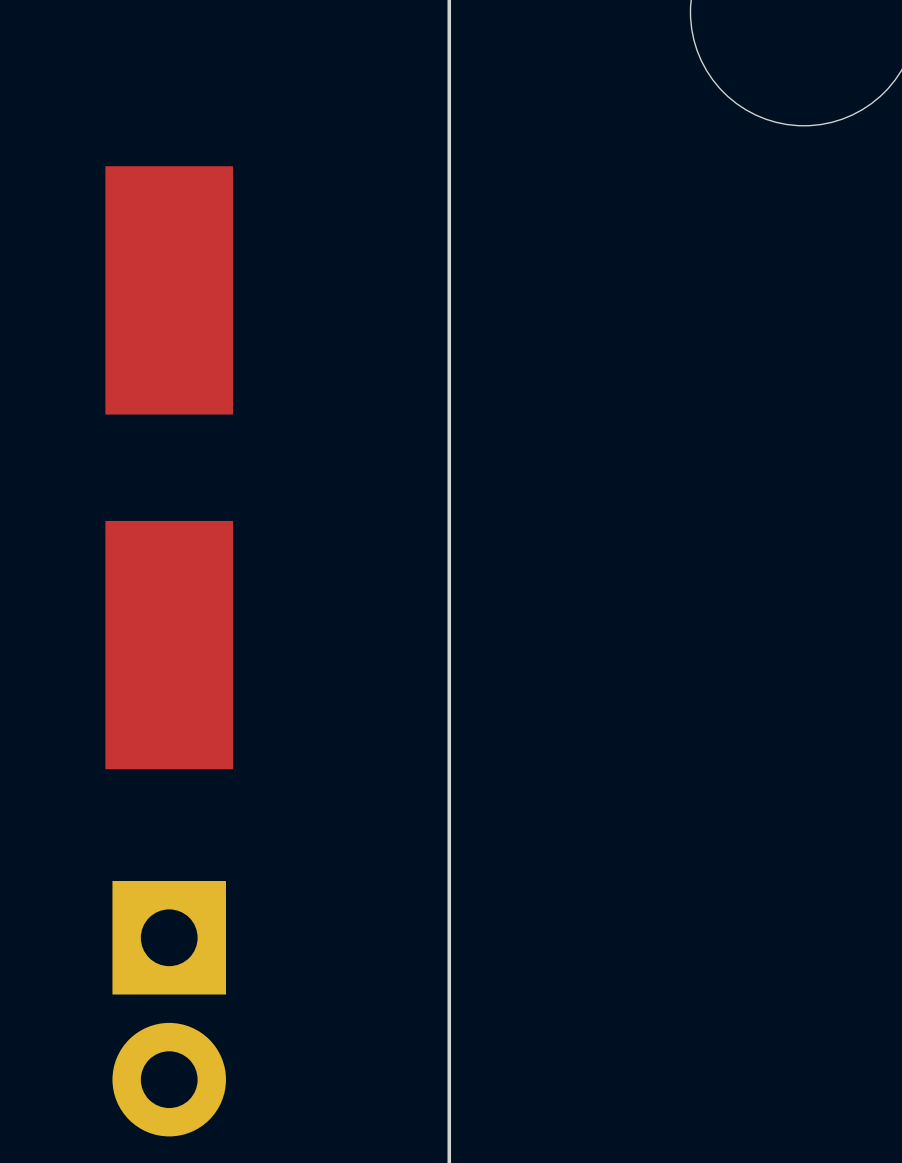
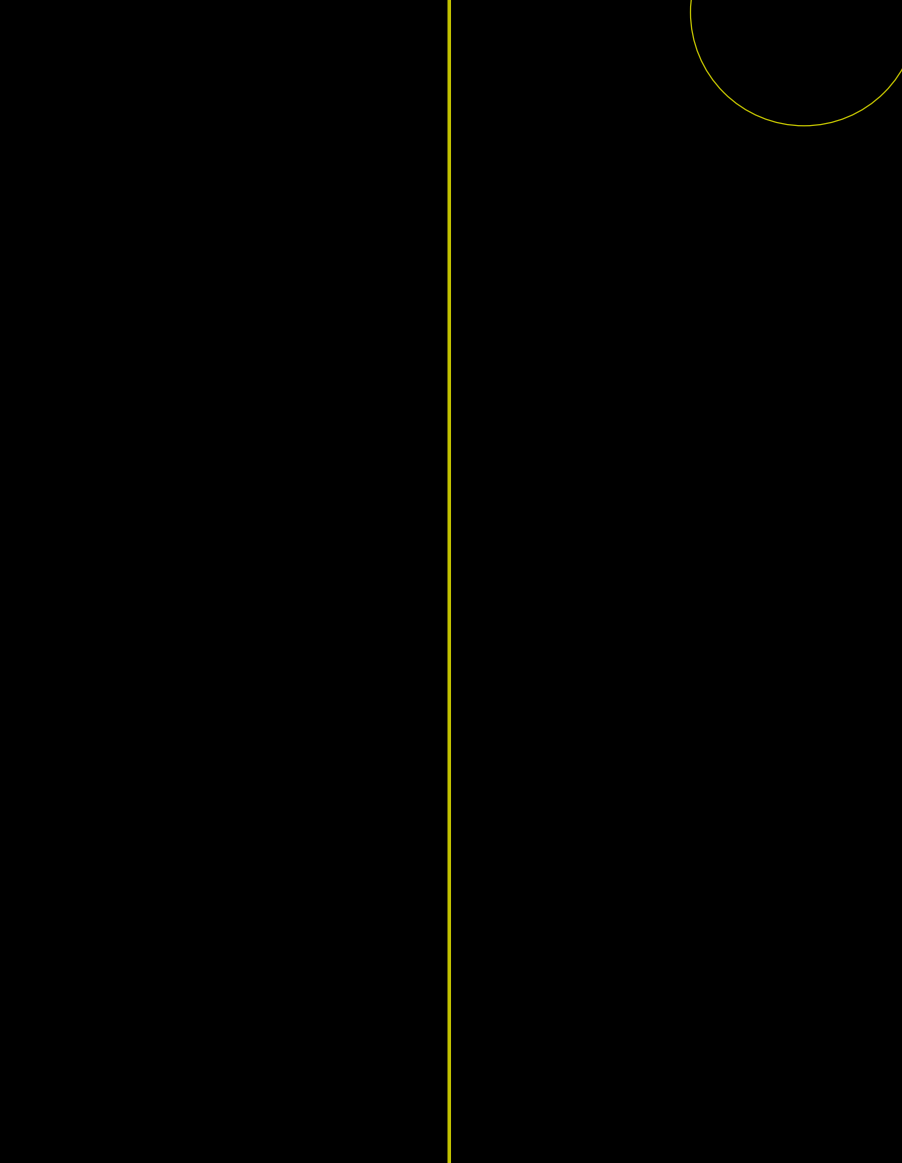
part: (169, 467) -> none
part: (169, 1008) -> none

